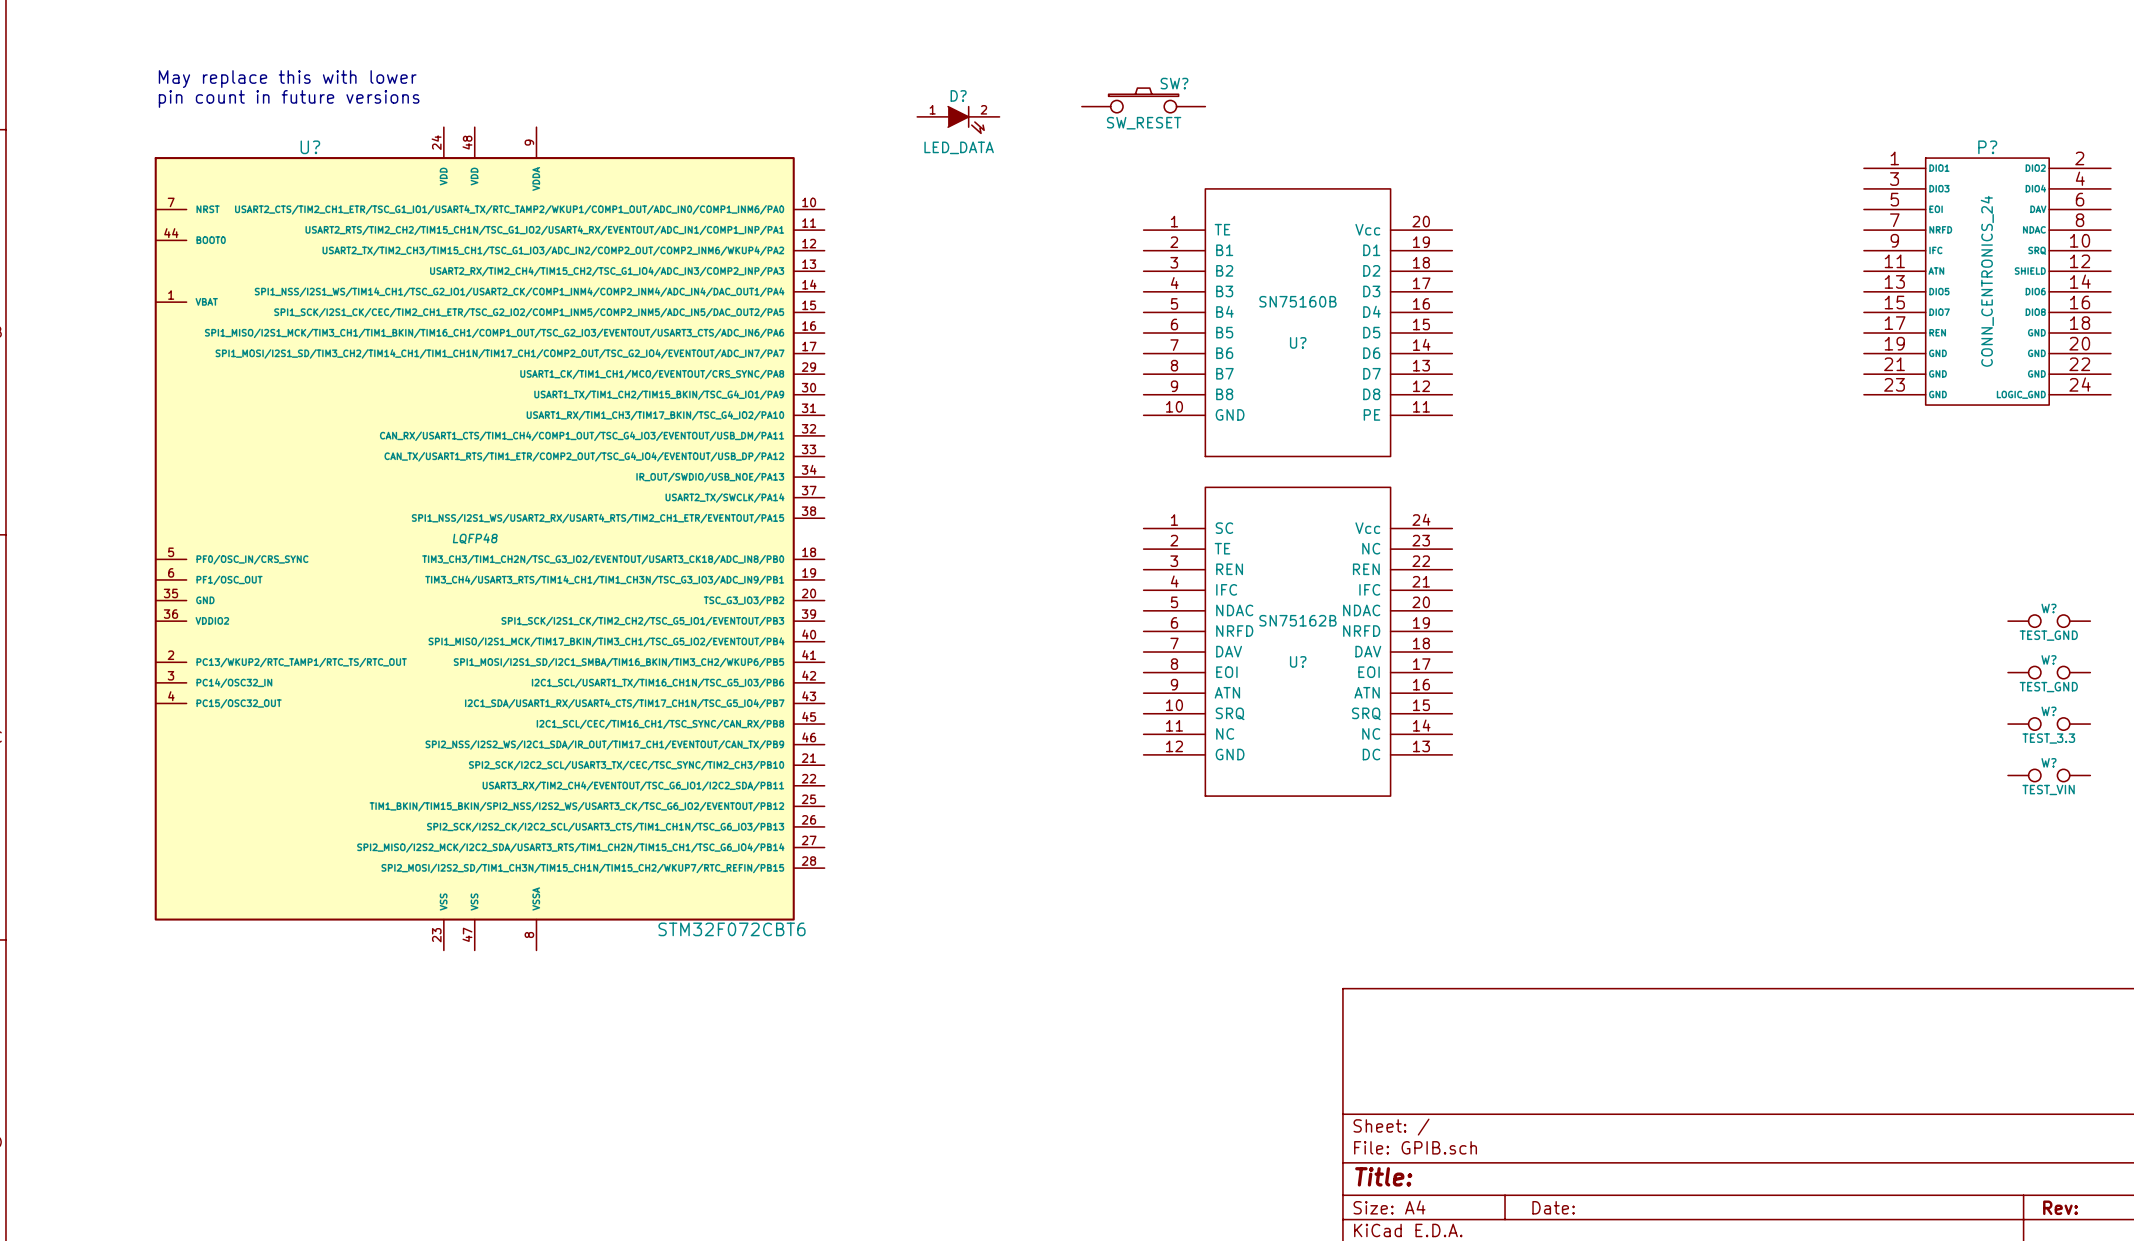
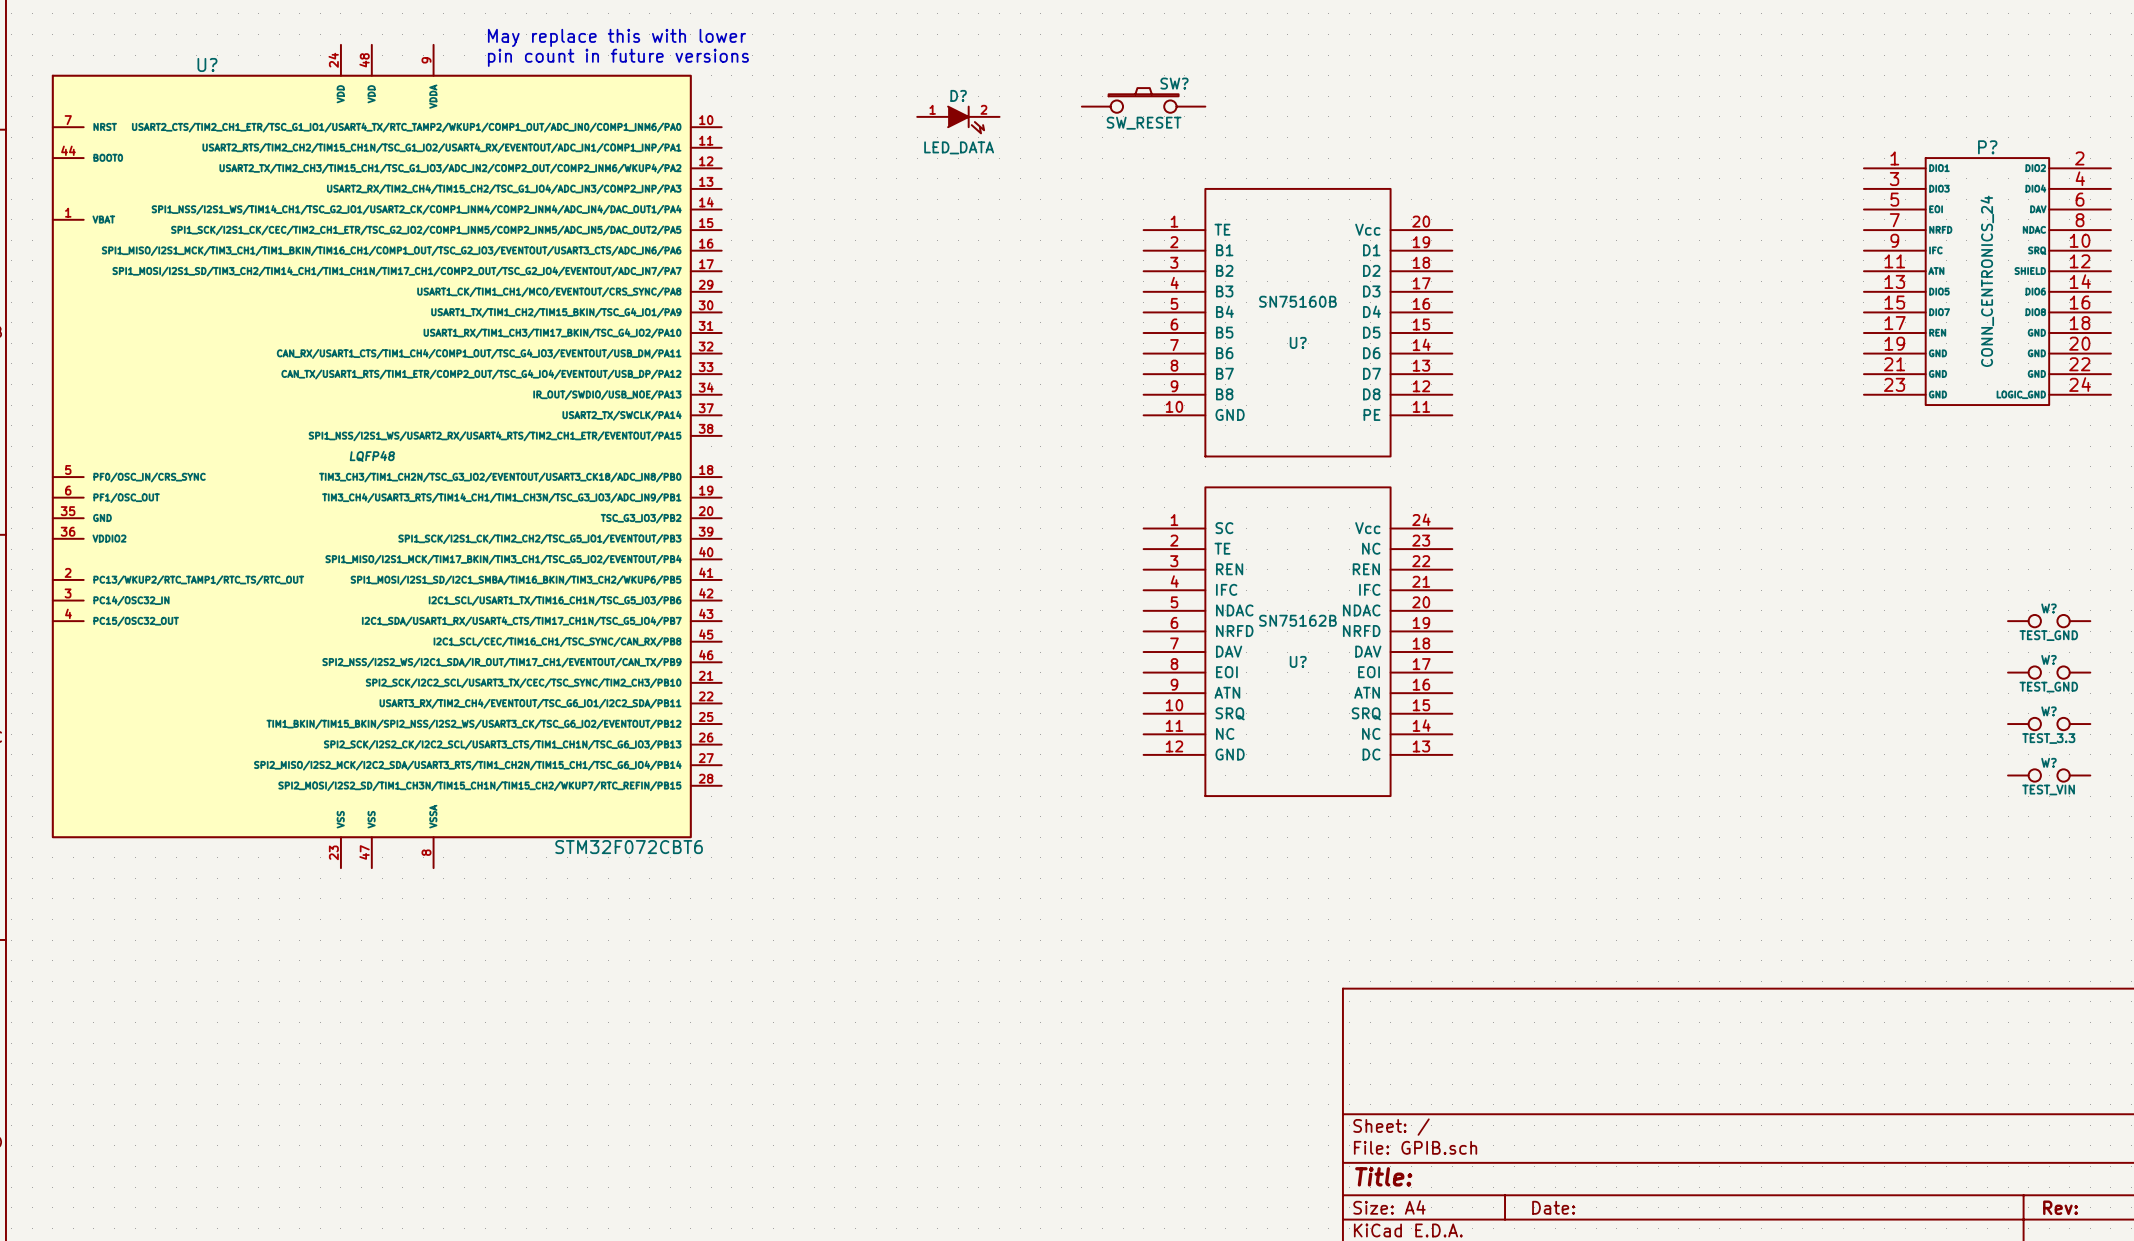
text: none -> May replace this with lower (616, 37)
text: none -> pin count in future versions (618, 57)
text: May replace this with lower (287, 79) -> none
text: pin count in future versions (289, 98) -> none
U? position: (489, 538) -> (386, 456)

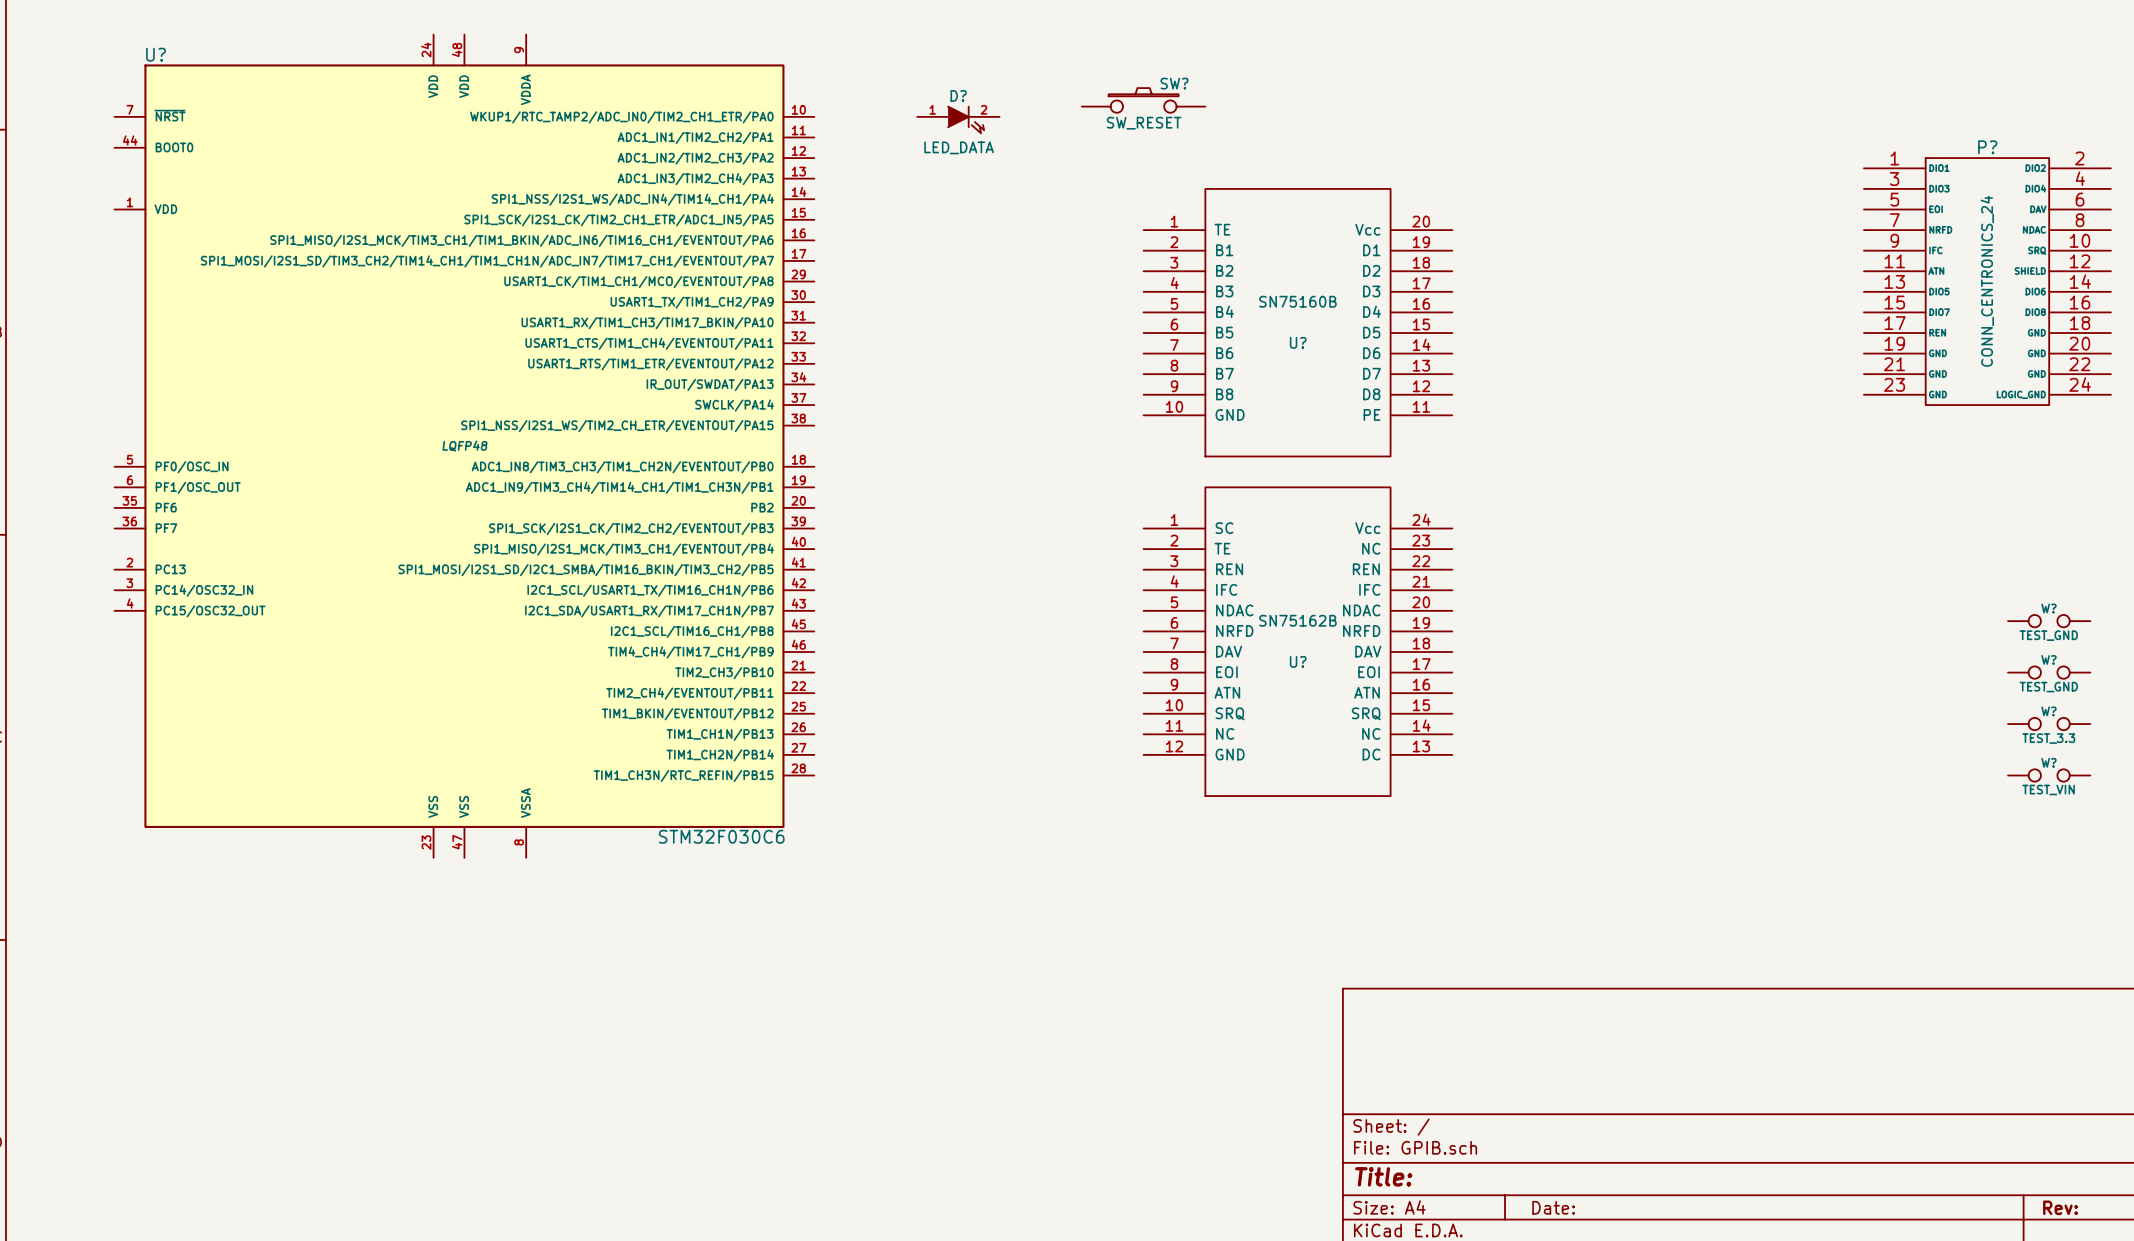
text: May replace this with lower (616, 37) -> none
text: pin count in future versions (618, 57) -> none
U?: none -> STM32F030C6 (464, 446)
U?: STM32F072CBT6 (386, 456) -> none

